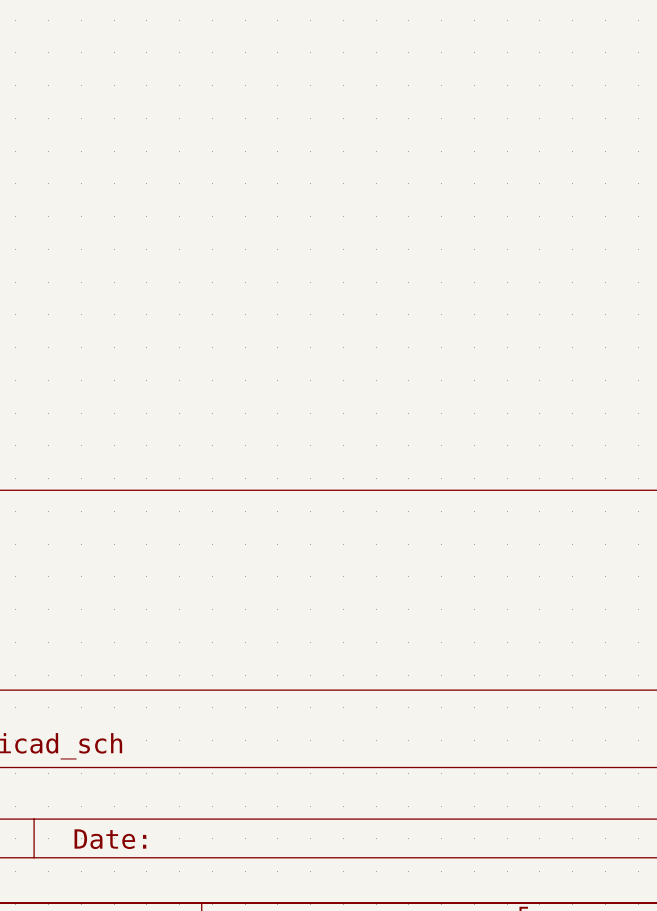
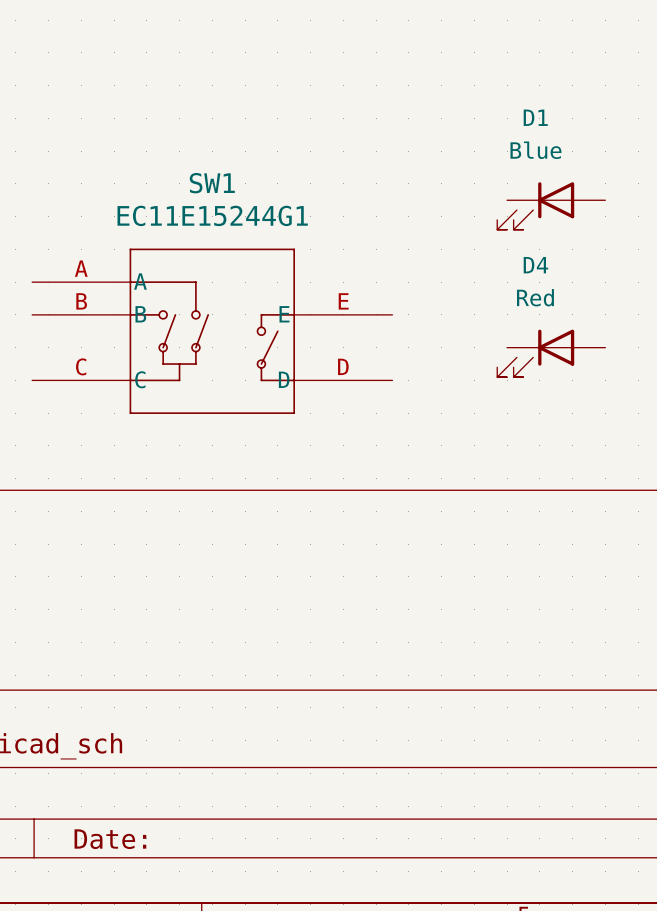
D1: none -> Blue (551, 205)
SW1: none -> EC11E15244G1 (212, 331)
D4: none -> Red (551, 353)

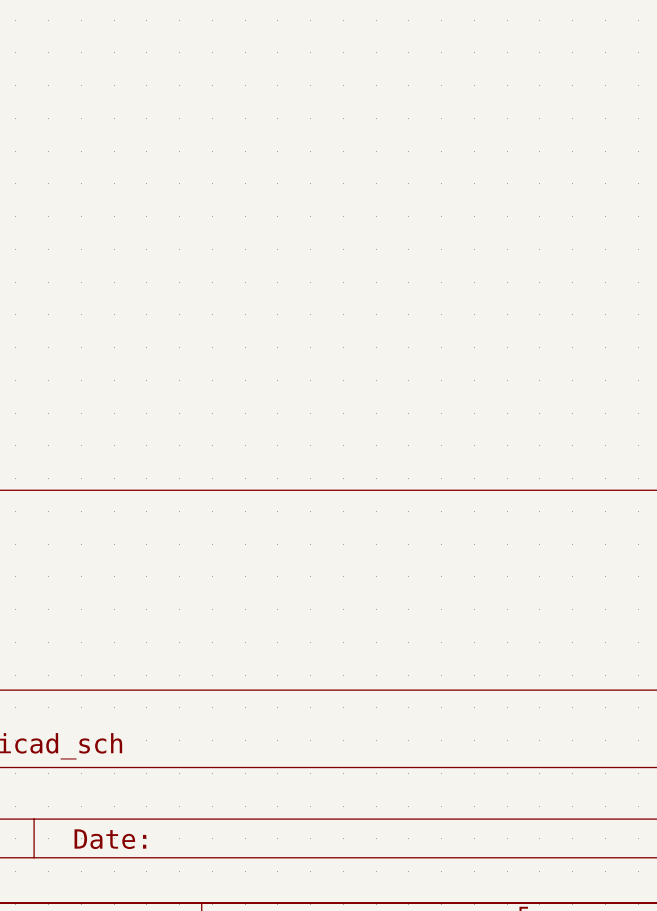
D1: Blue (551, 205) -> none
SW1: EC11E15244G1 (212, 331) -> none
D4: Red (551, 353) -> none

